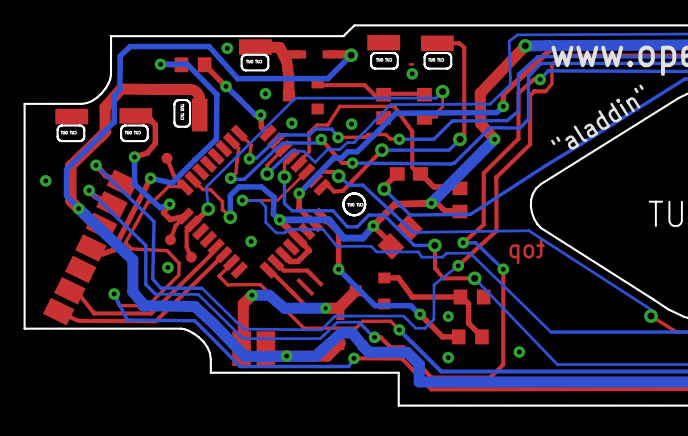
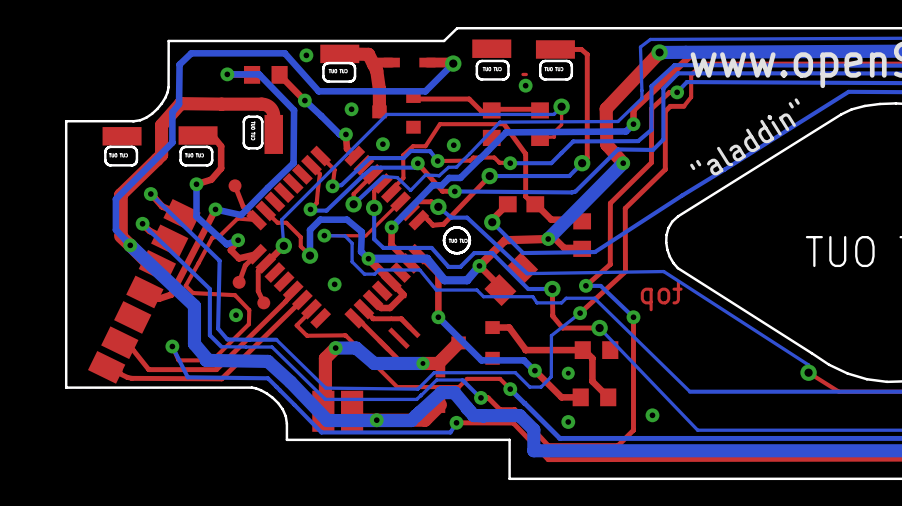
via: (45, 180) -> none

